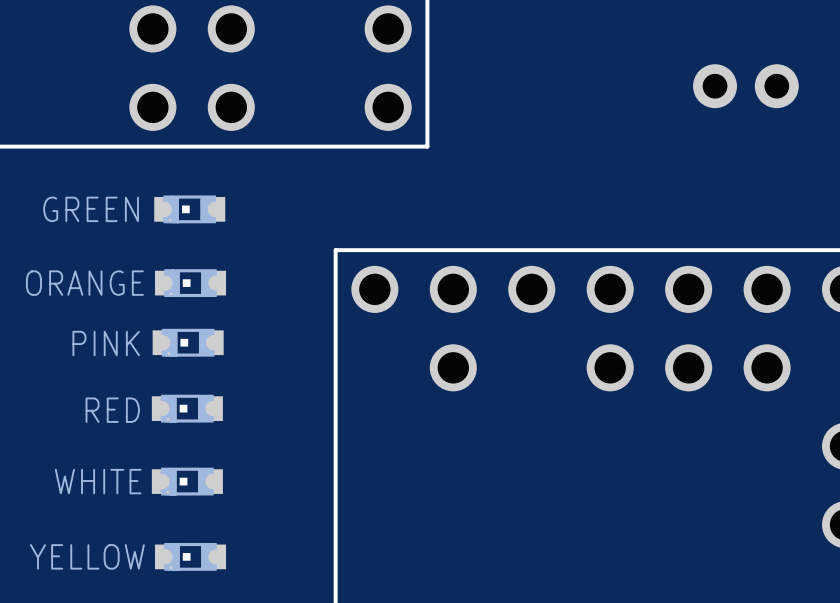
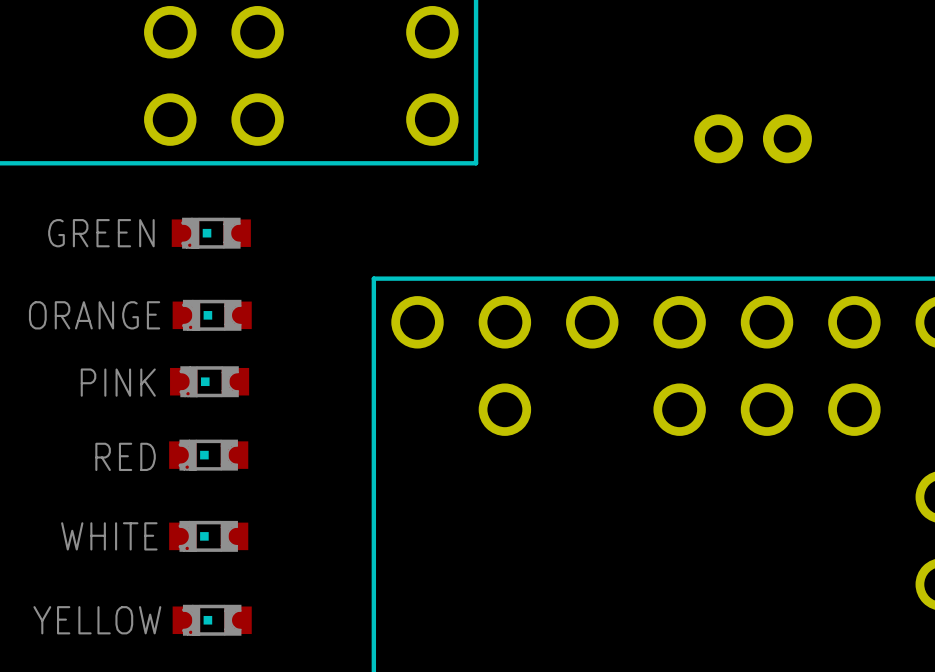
part position: (745, 86) -> (753, 138)

